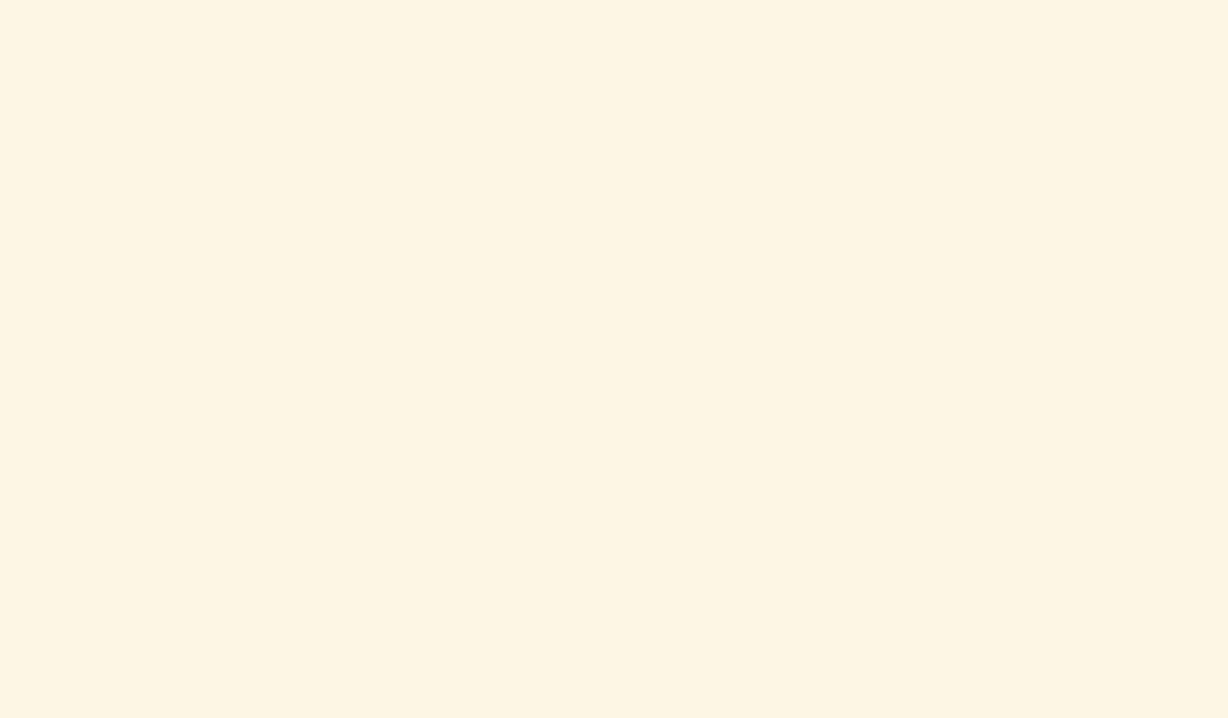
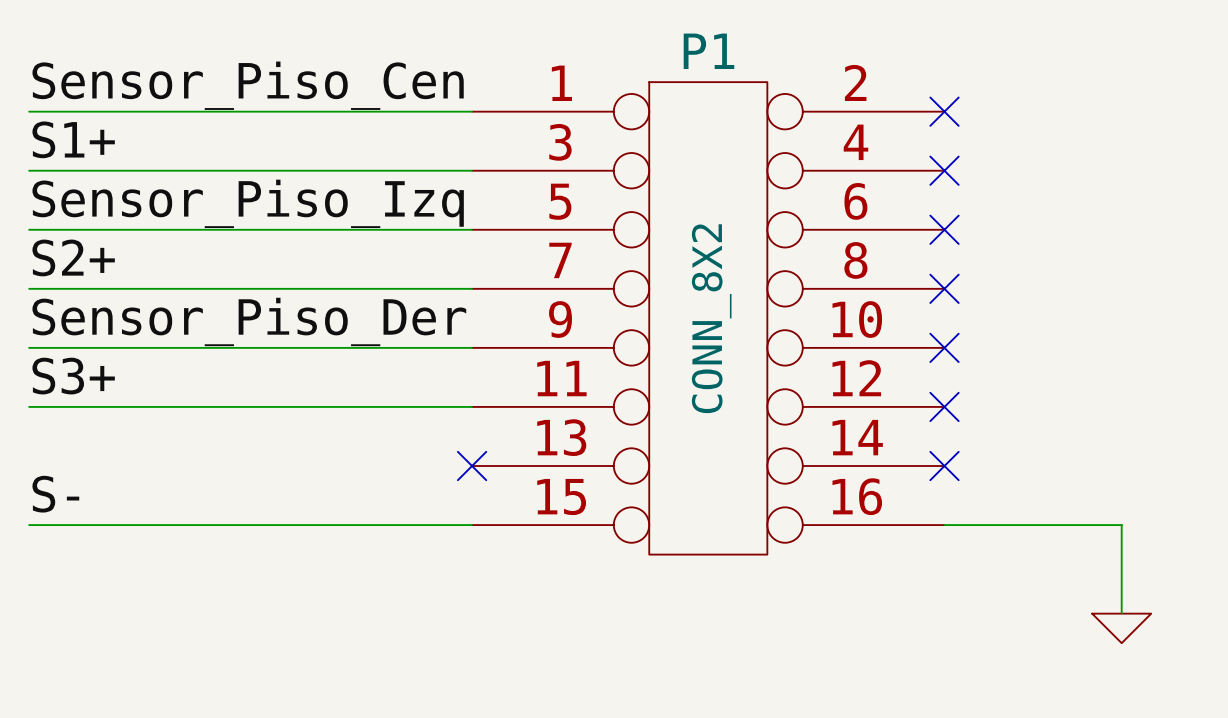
label: none -> Sensor_Piso_Cen (248, 85)
wire: none -> (29, 111) (472, 111)
no-connect mark: none -> (944, 111)
label: none -> S1+ (73, 139)
wire: none -> (29, 170) (472, 170)
no-connect mark: none -> (944, 170)
label: none -> Sensor_Piso_Izq (248, 203)
wire: none -> (29, 229) (472, 229)
no-connect mark: none -> (944, 229)
label: none -> S2+ (73, 257)
wire: none -> (29, 288) (472, 288)
no-connect mark: none -> (944, 288)
label: none -> Sensor_Piso_Der (249, 321)
P1: none -> CONN_8X2 (708, 318)
wire: none -> (29, 347) (472, 347)
no-connect mark: none -> (944, 347)
label: none -> S3+ (73, 376)
wire: none -> (29, 406) (472, 406)
no-connect mark: none -> (944, 406)
no-connect mark: none -> (472, 466)
no-connect mark: none -> (944, 466)
label: none -> S- (55, 494)
wire: none -> (29, 525) (472, 525)
wire: none -> (944, 525) (1121, 525) (1121, 613)
power symbol: none -> (1121, 628)

